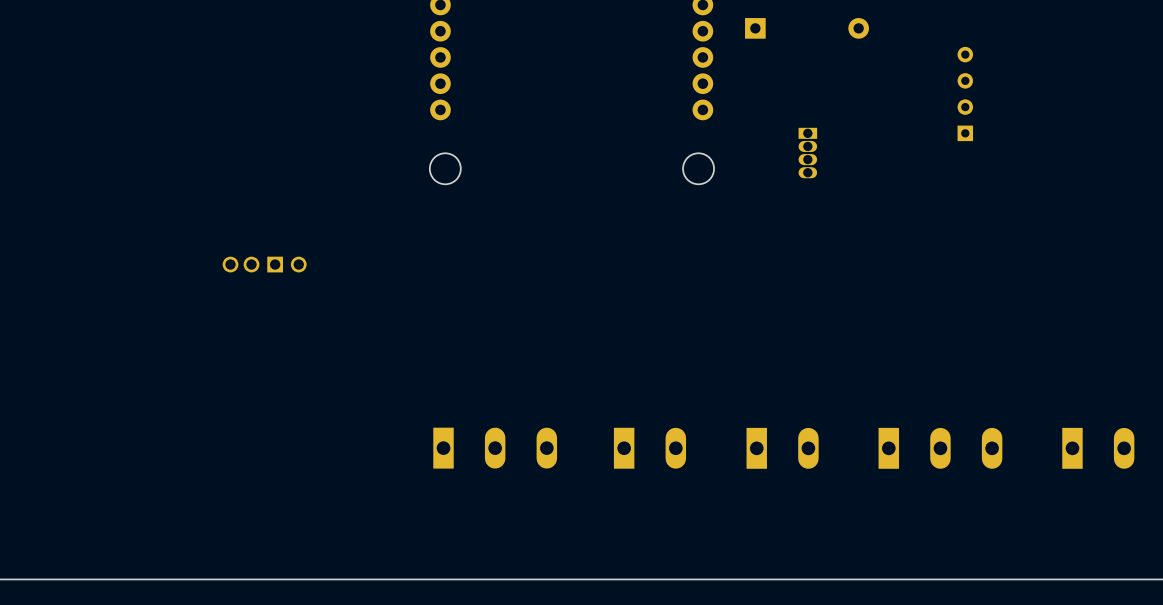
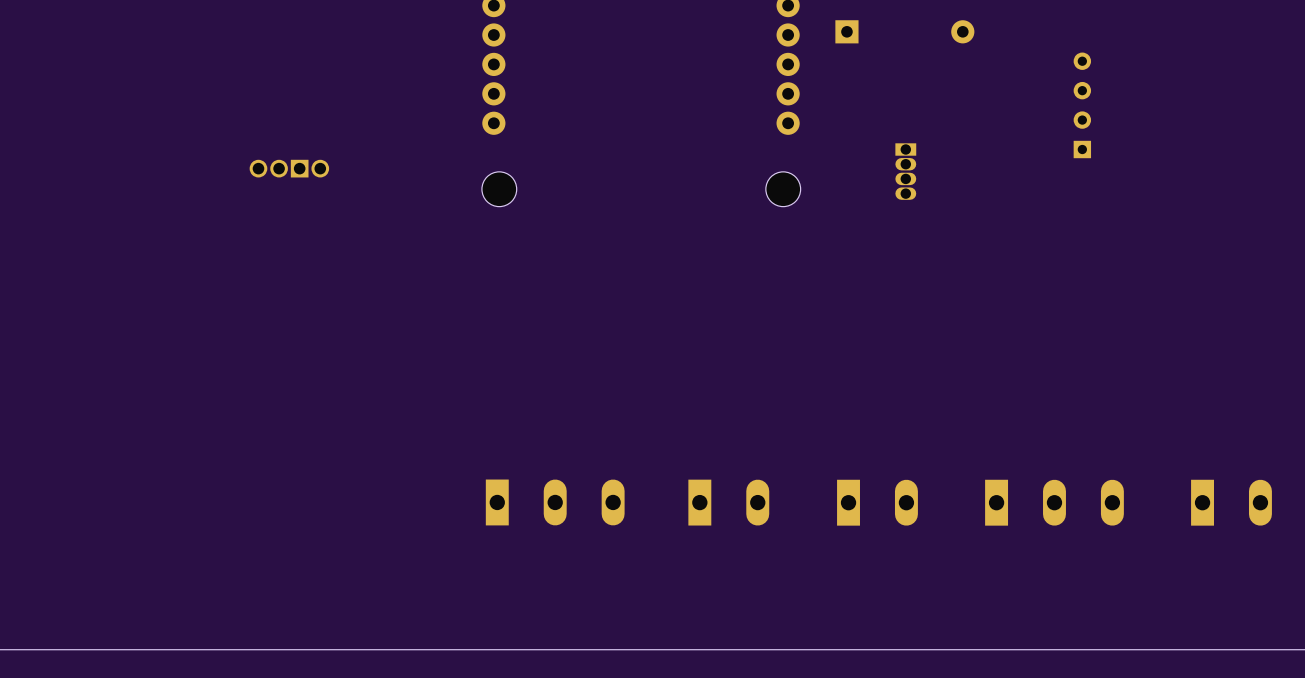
part: none -> (289, 168)
part: (264, 264) -> none

